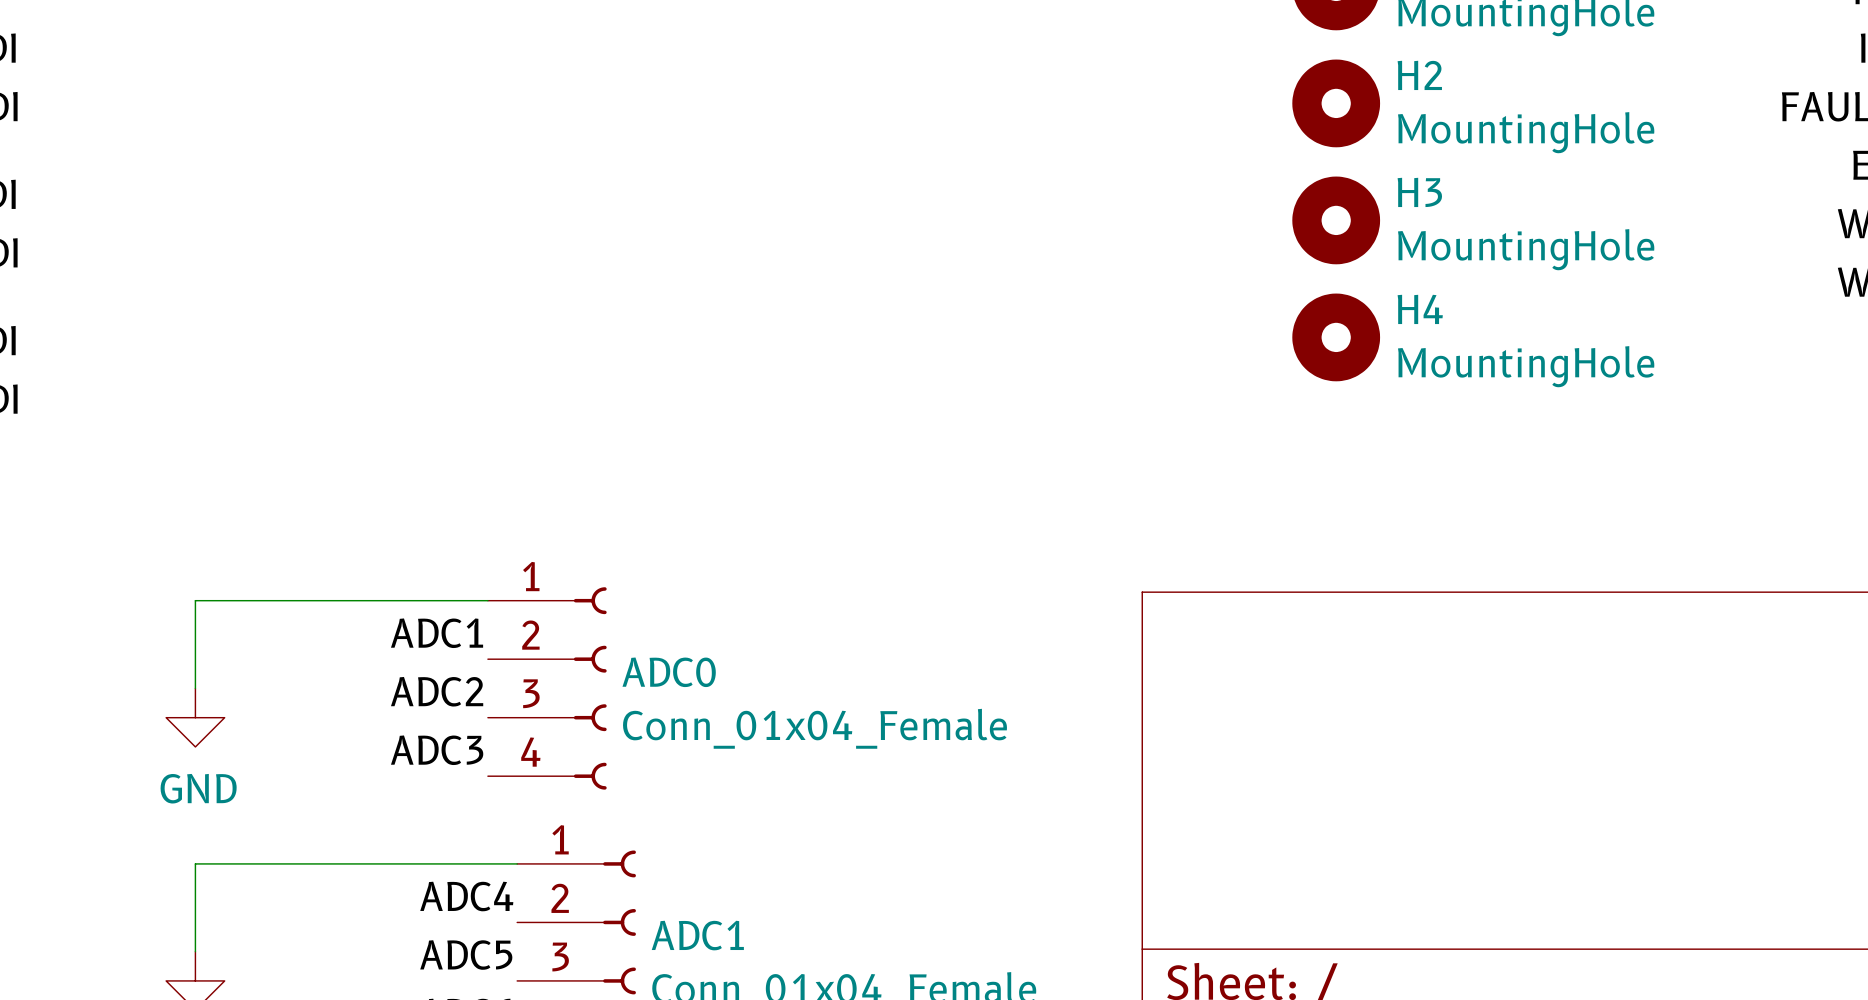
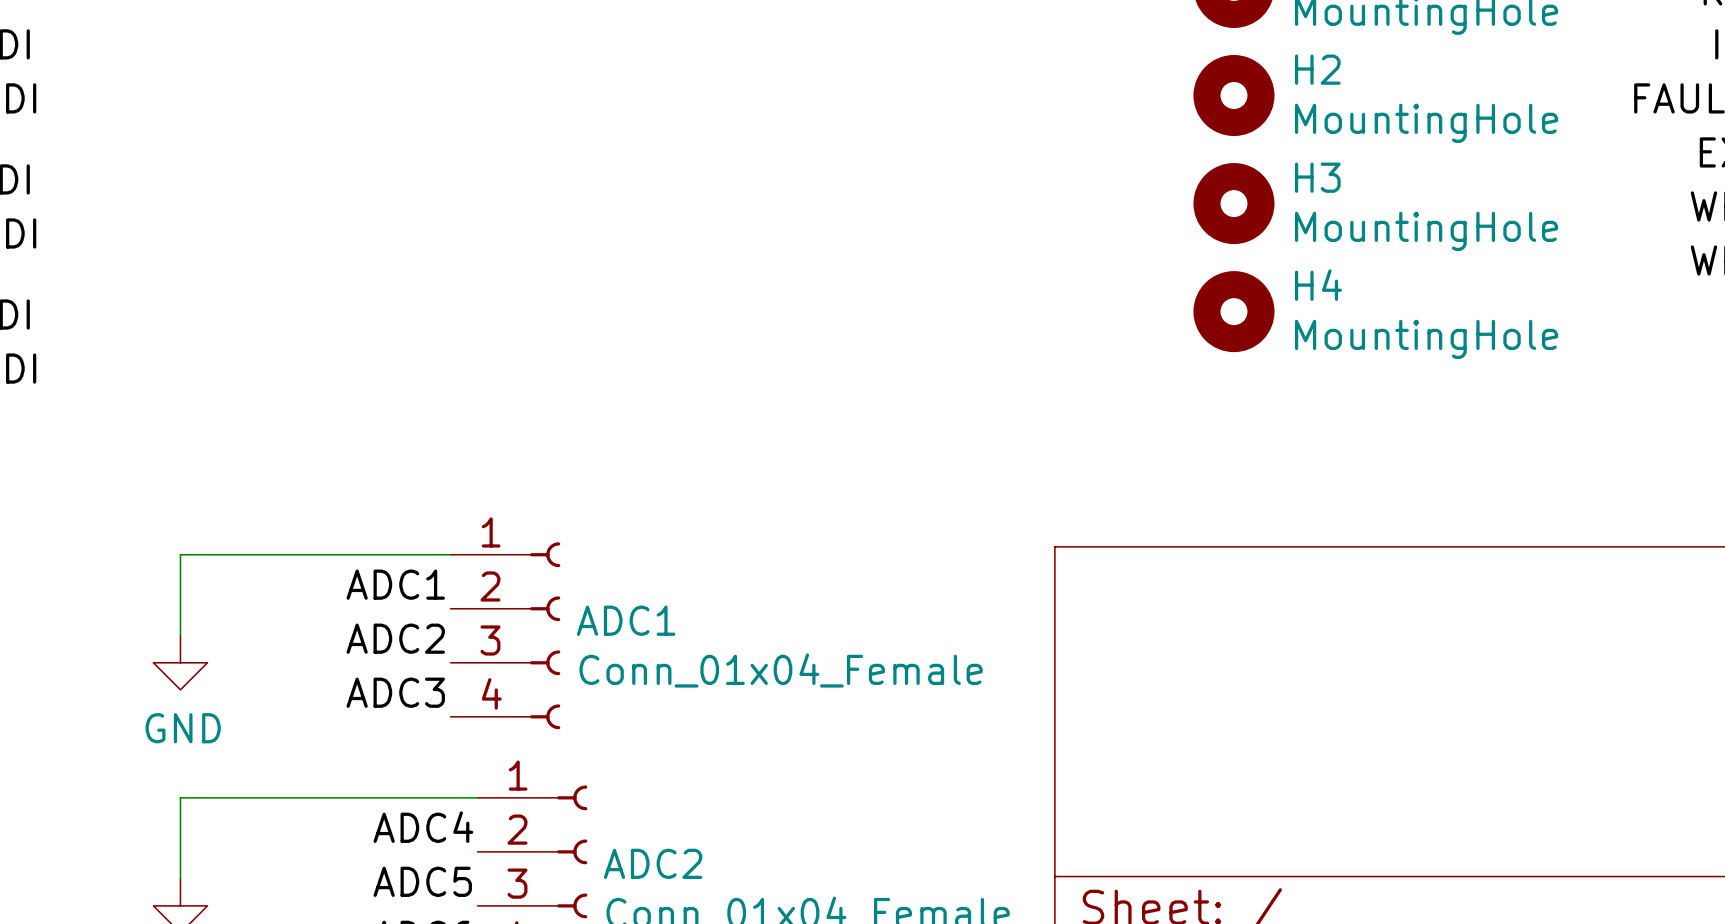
ADC0 name: ADC0 (669, 672) -> ADC1 (626, 620)
ADC1 name: ADC1 (697, 935) -> ADC2 (653, 863)

